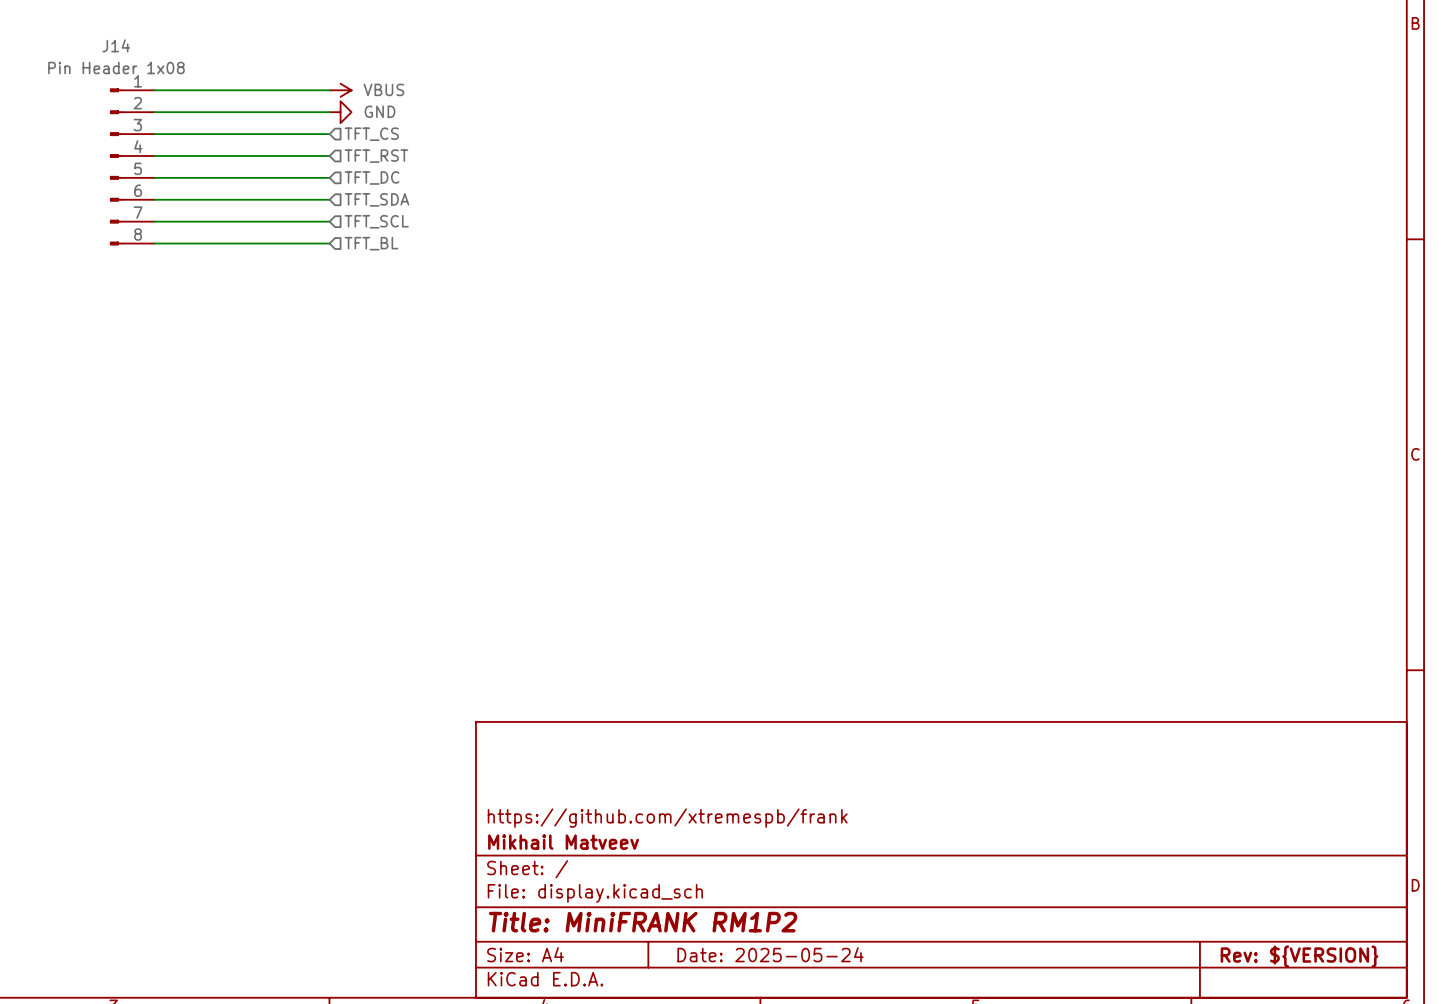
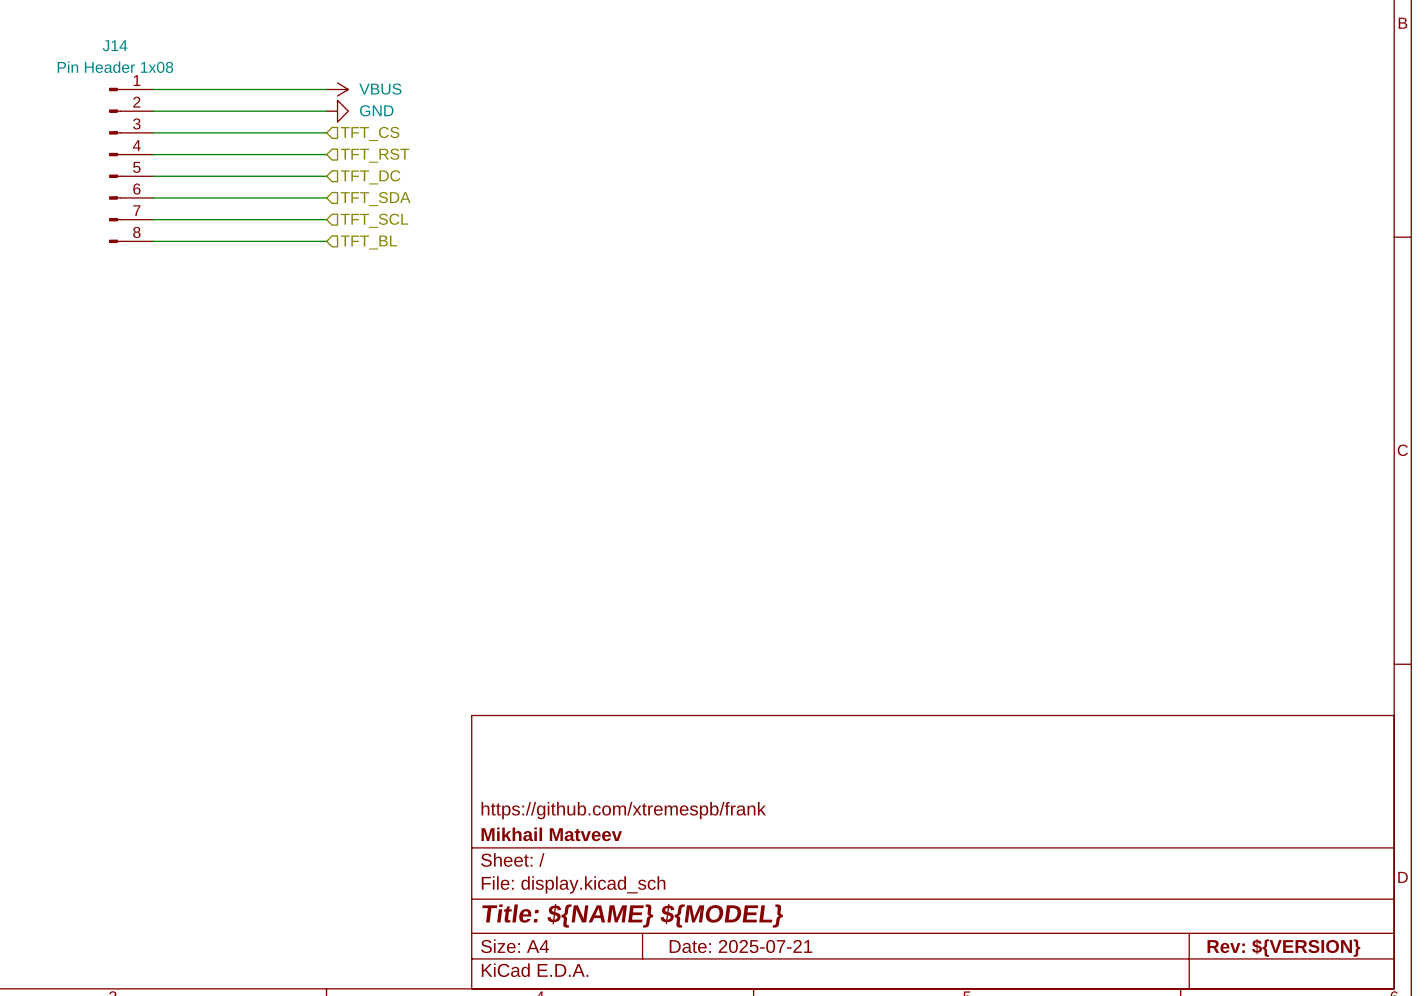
title block: Title: MiniFRANK RM1P2 (643, 922) -> Title: ${NAME} ${MODEL} (632, 915)
title block: Date: 2025-05-24 (770, 954) -> Date: 2025-07-21 (740, 946)

